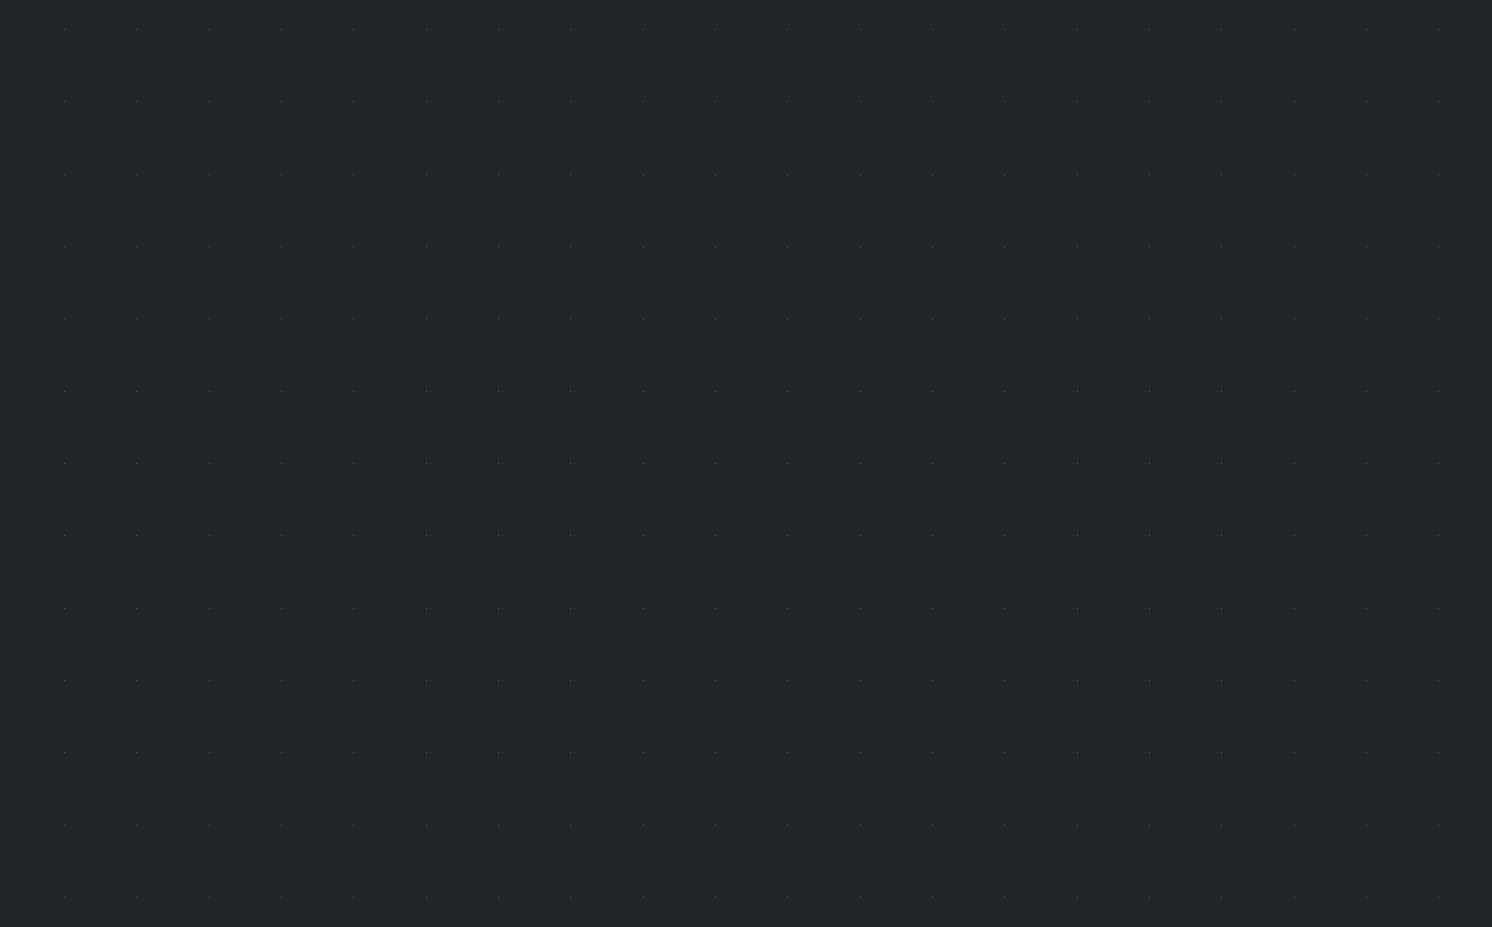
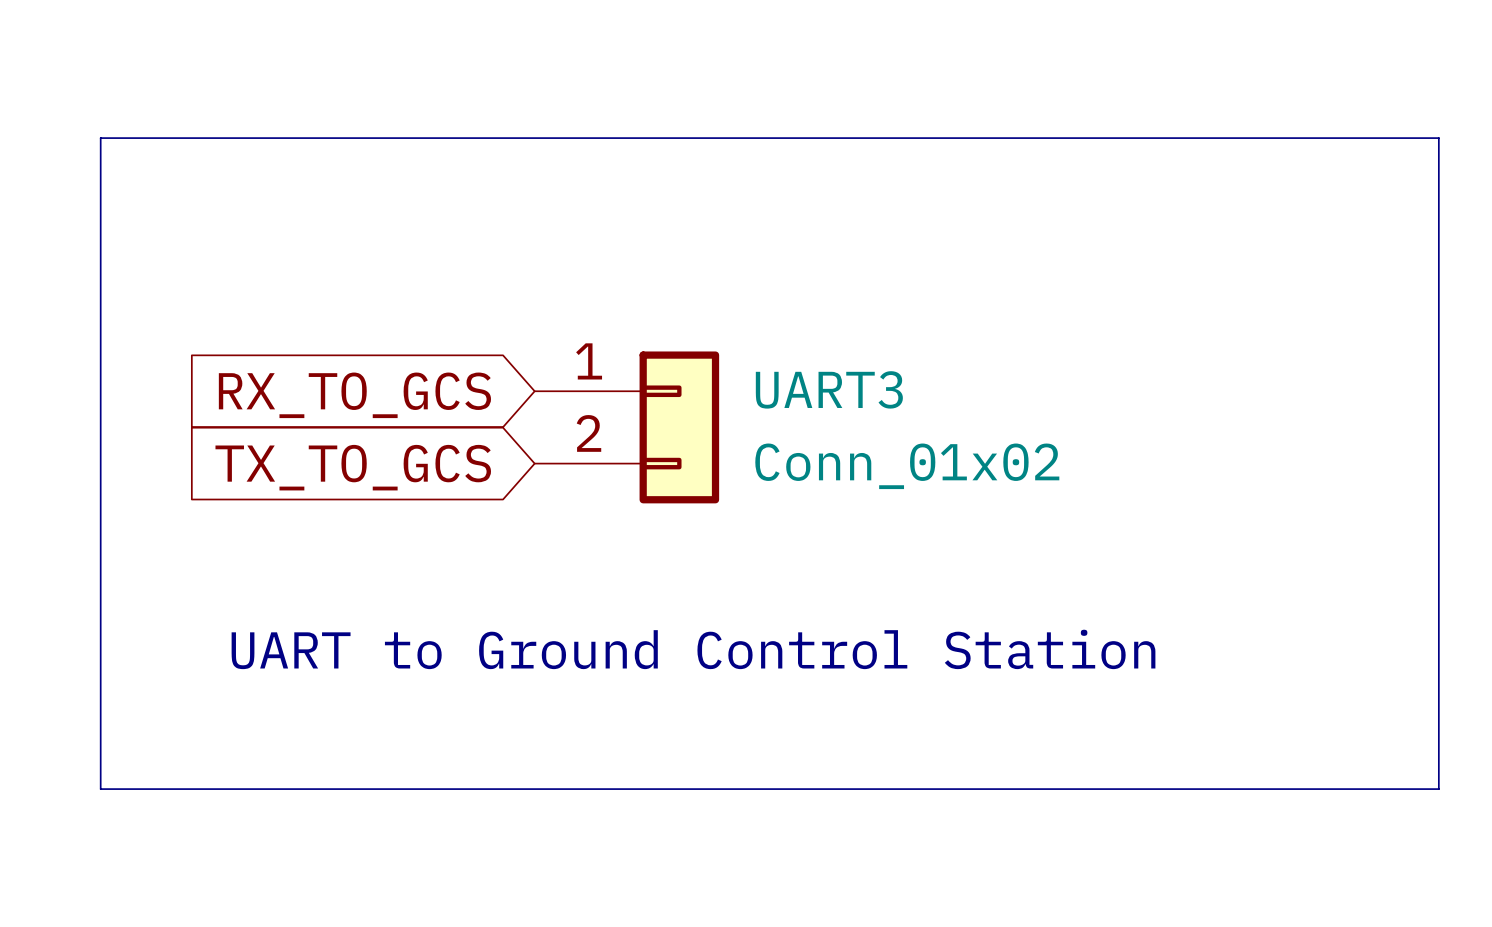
line: none -> (100, 138) (1438, 138) (1438, 789) (100, 789) (100, 138)
global label: none -> RX_TO_GCS (354, 395)
UART3: none -> Conn_01x02 (626, 427)
global label: none -> TX_TO_GCS (353, 467)
text: none -> UART to Ground Control Station (693, 649)

